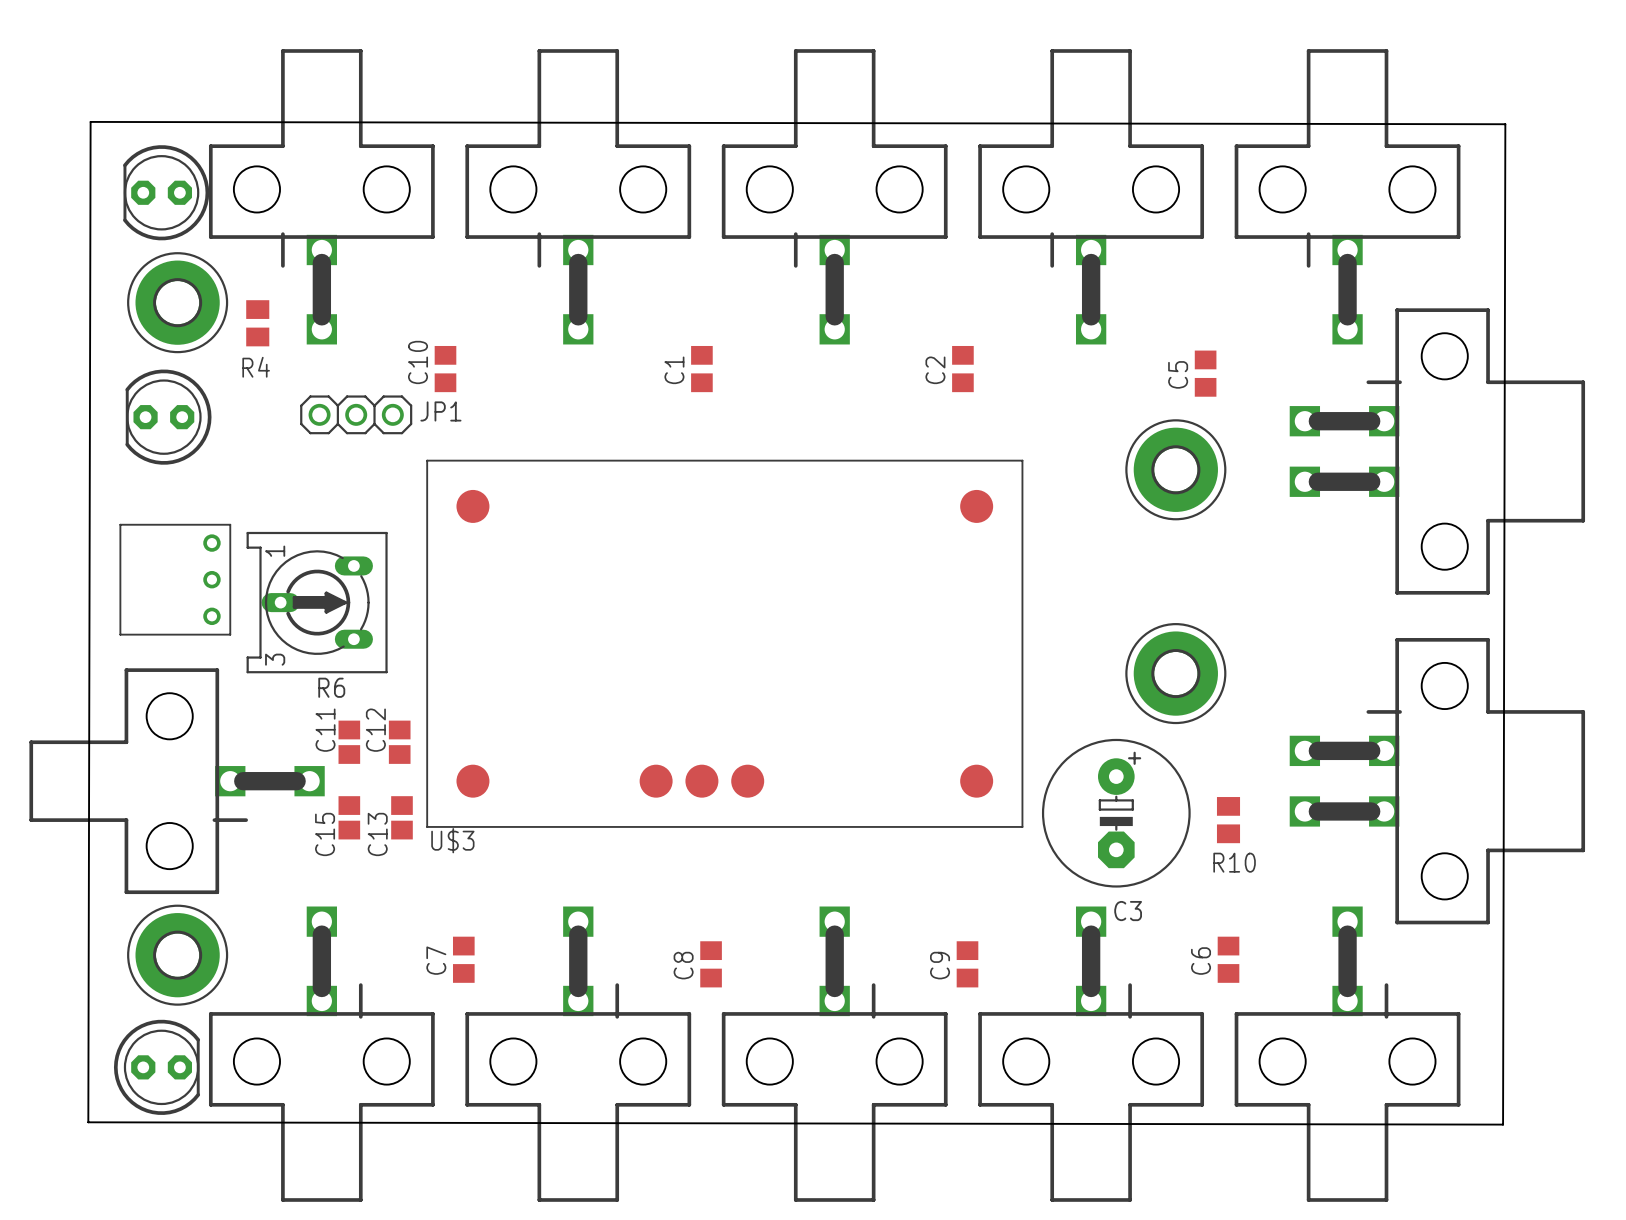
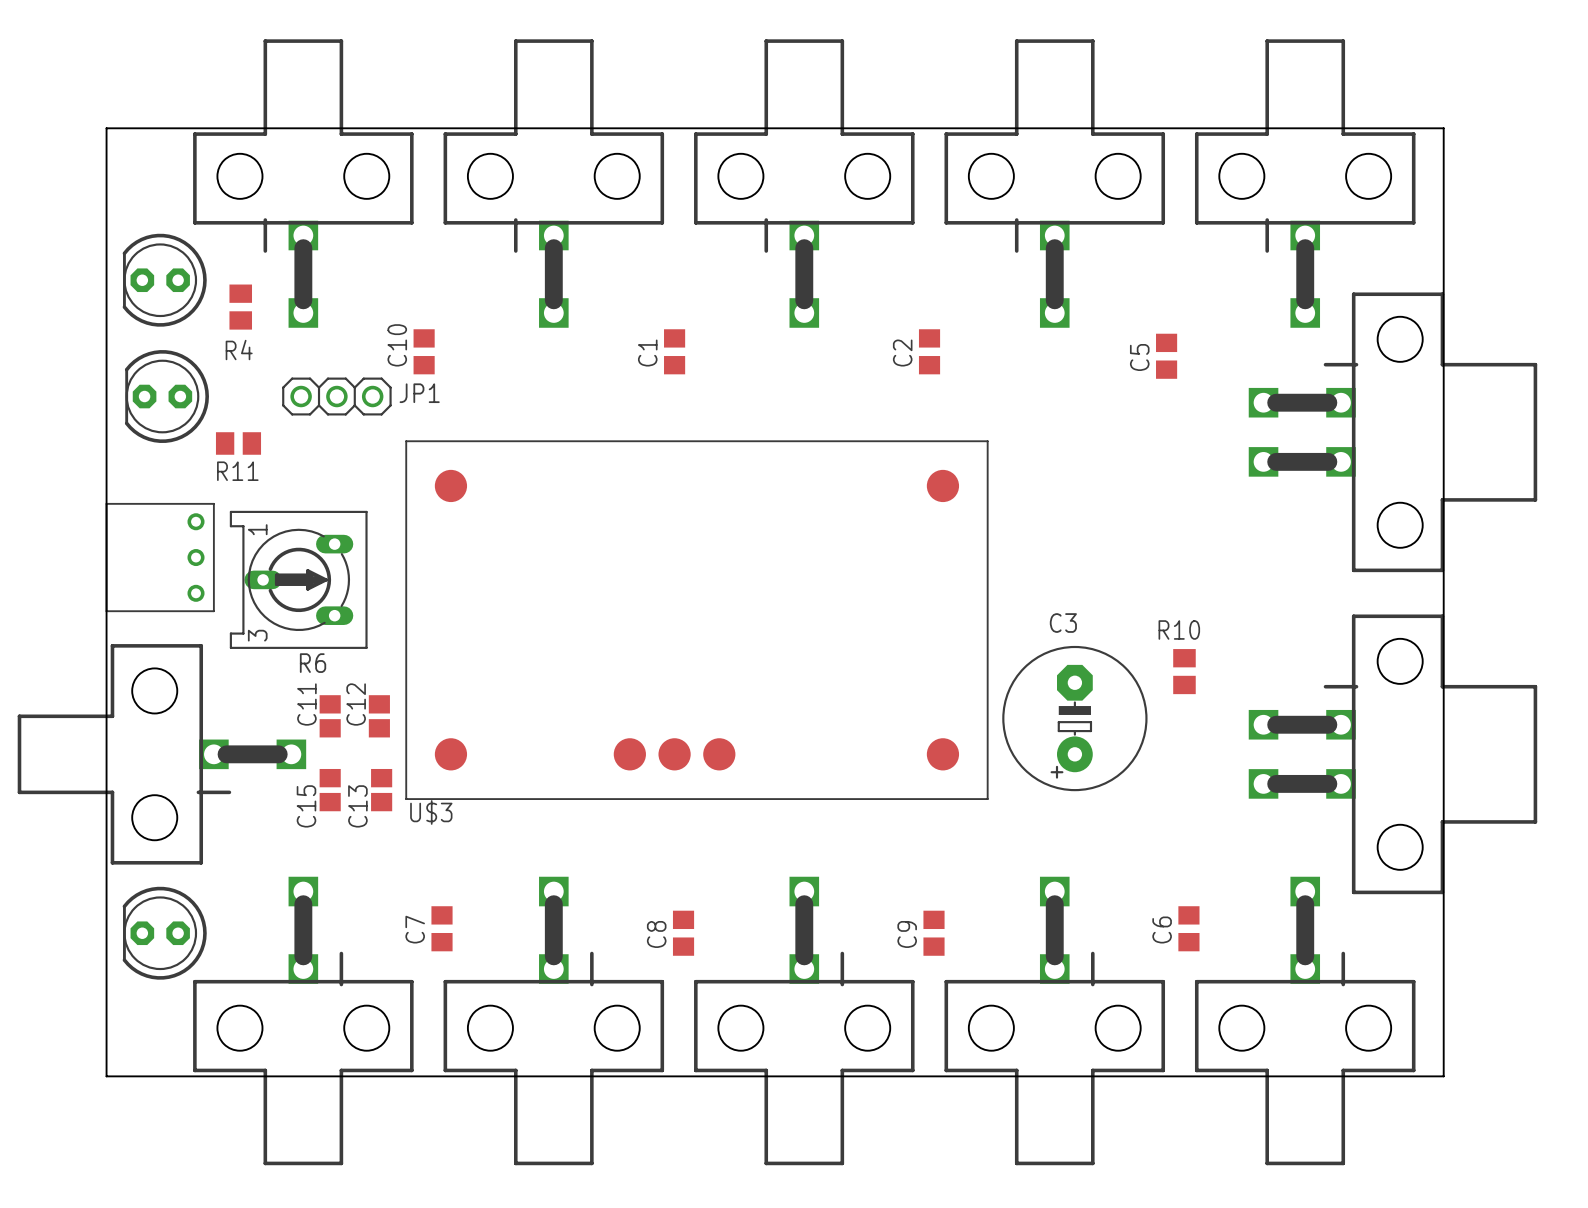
board edge: (90, 121) (1505, 124) (1503, 1124) (88, 1122) (90, 121) -> (106, 128) (106, 1076) (1443, 1076) (1443, 128) (106, 128)
part: (166, 192) -> none
part footprint: [127, 252, 229, 354] -> [122, 233, 207, 327]
part position: (168, 417) -> (166, 396)
R11: none -> (238, 443)
part: (1175, 469) -> none
part: (1175, 673) -> none
C3 footprint: [1041, 738, 1191, 888] -> [1002, 645, 1148, 792]
R10 position: (1228, 820) -> (1184, 671)
R10 name position: R10 (1234, 862) -> R10 (1179, 629)
part footprint: [127, 904, 229, 1006] -> [122, 886, 207, 980]
C3 name position: C3 (1128, 911) -> C3 (1063, 623)
part: (157, 1067) -> none

